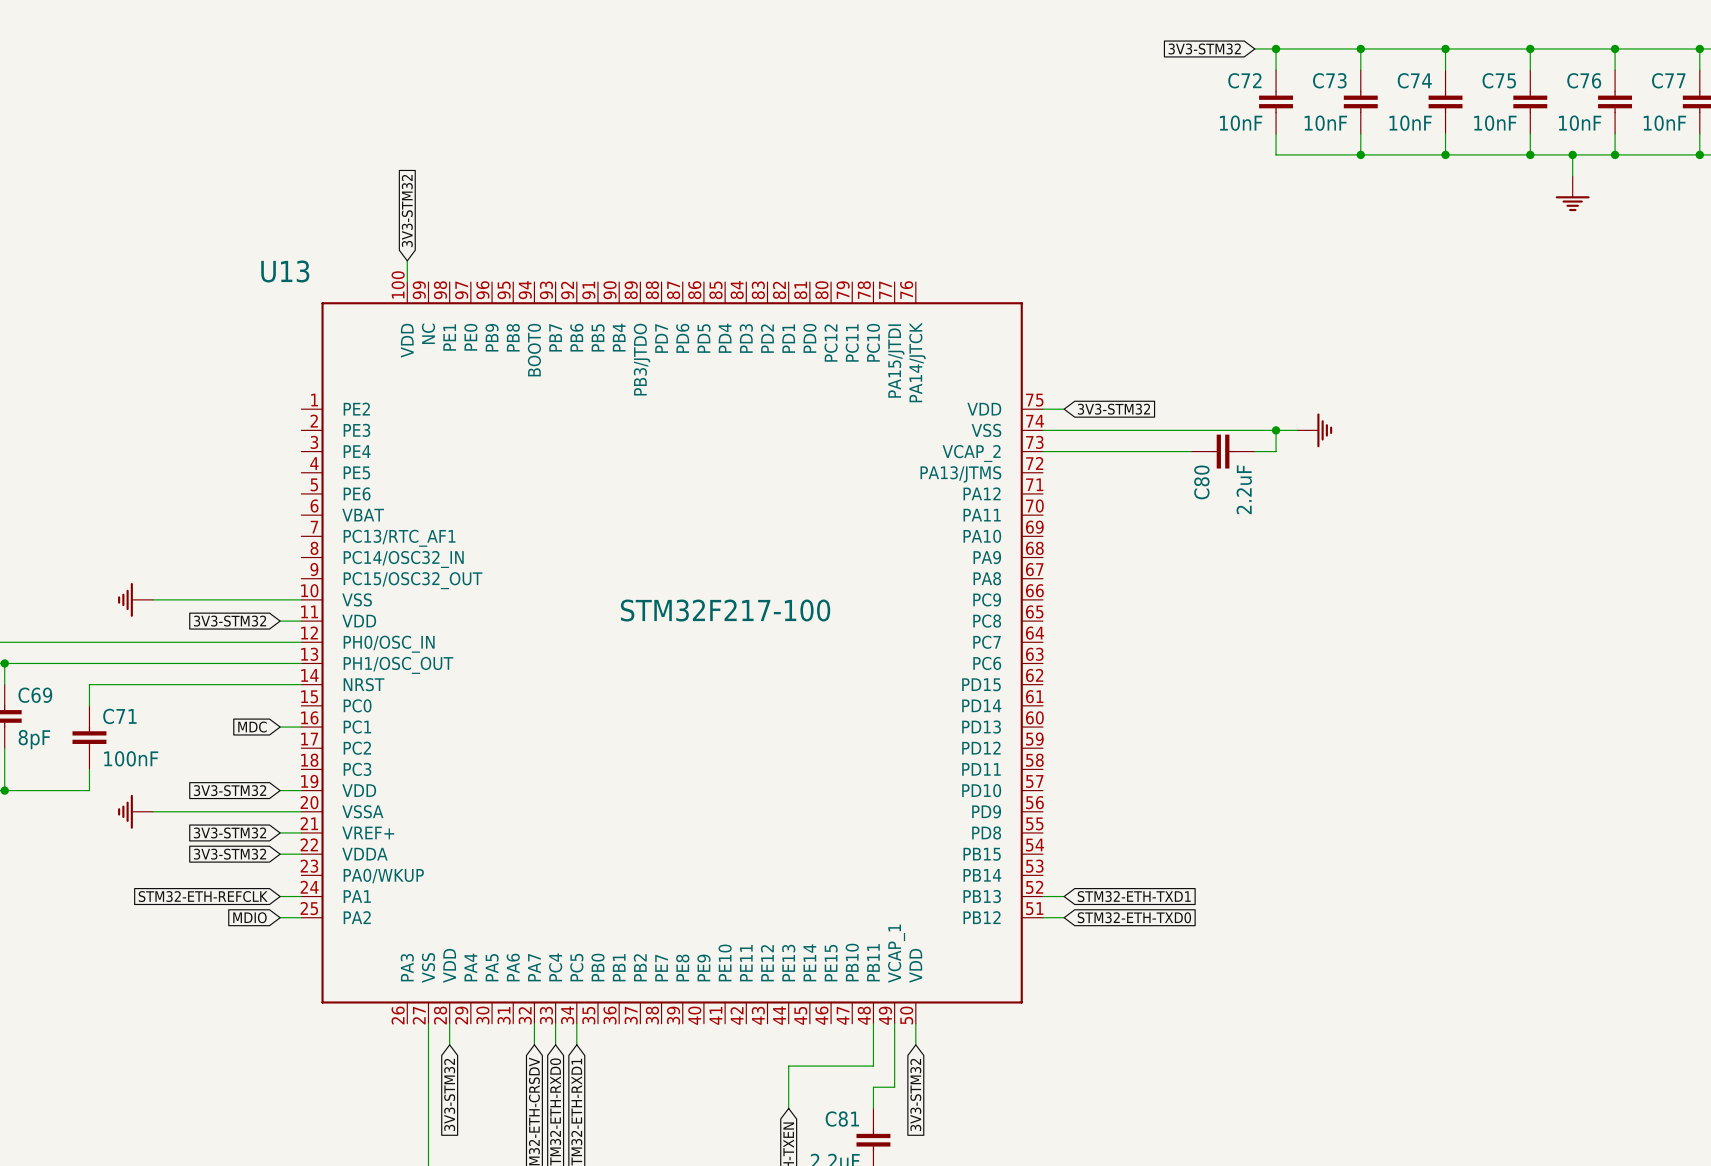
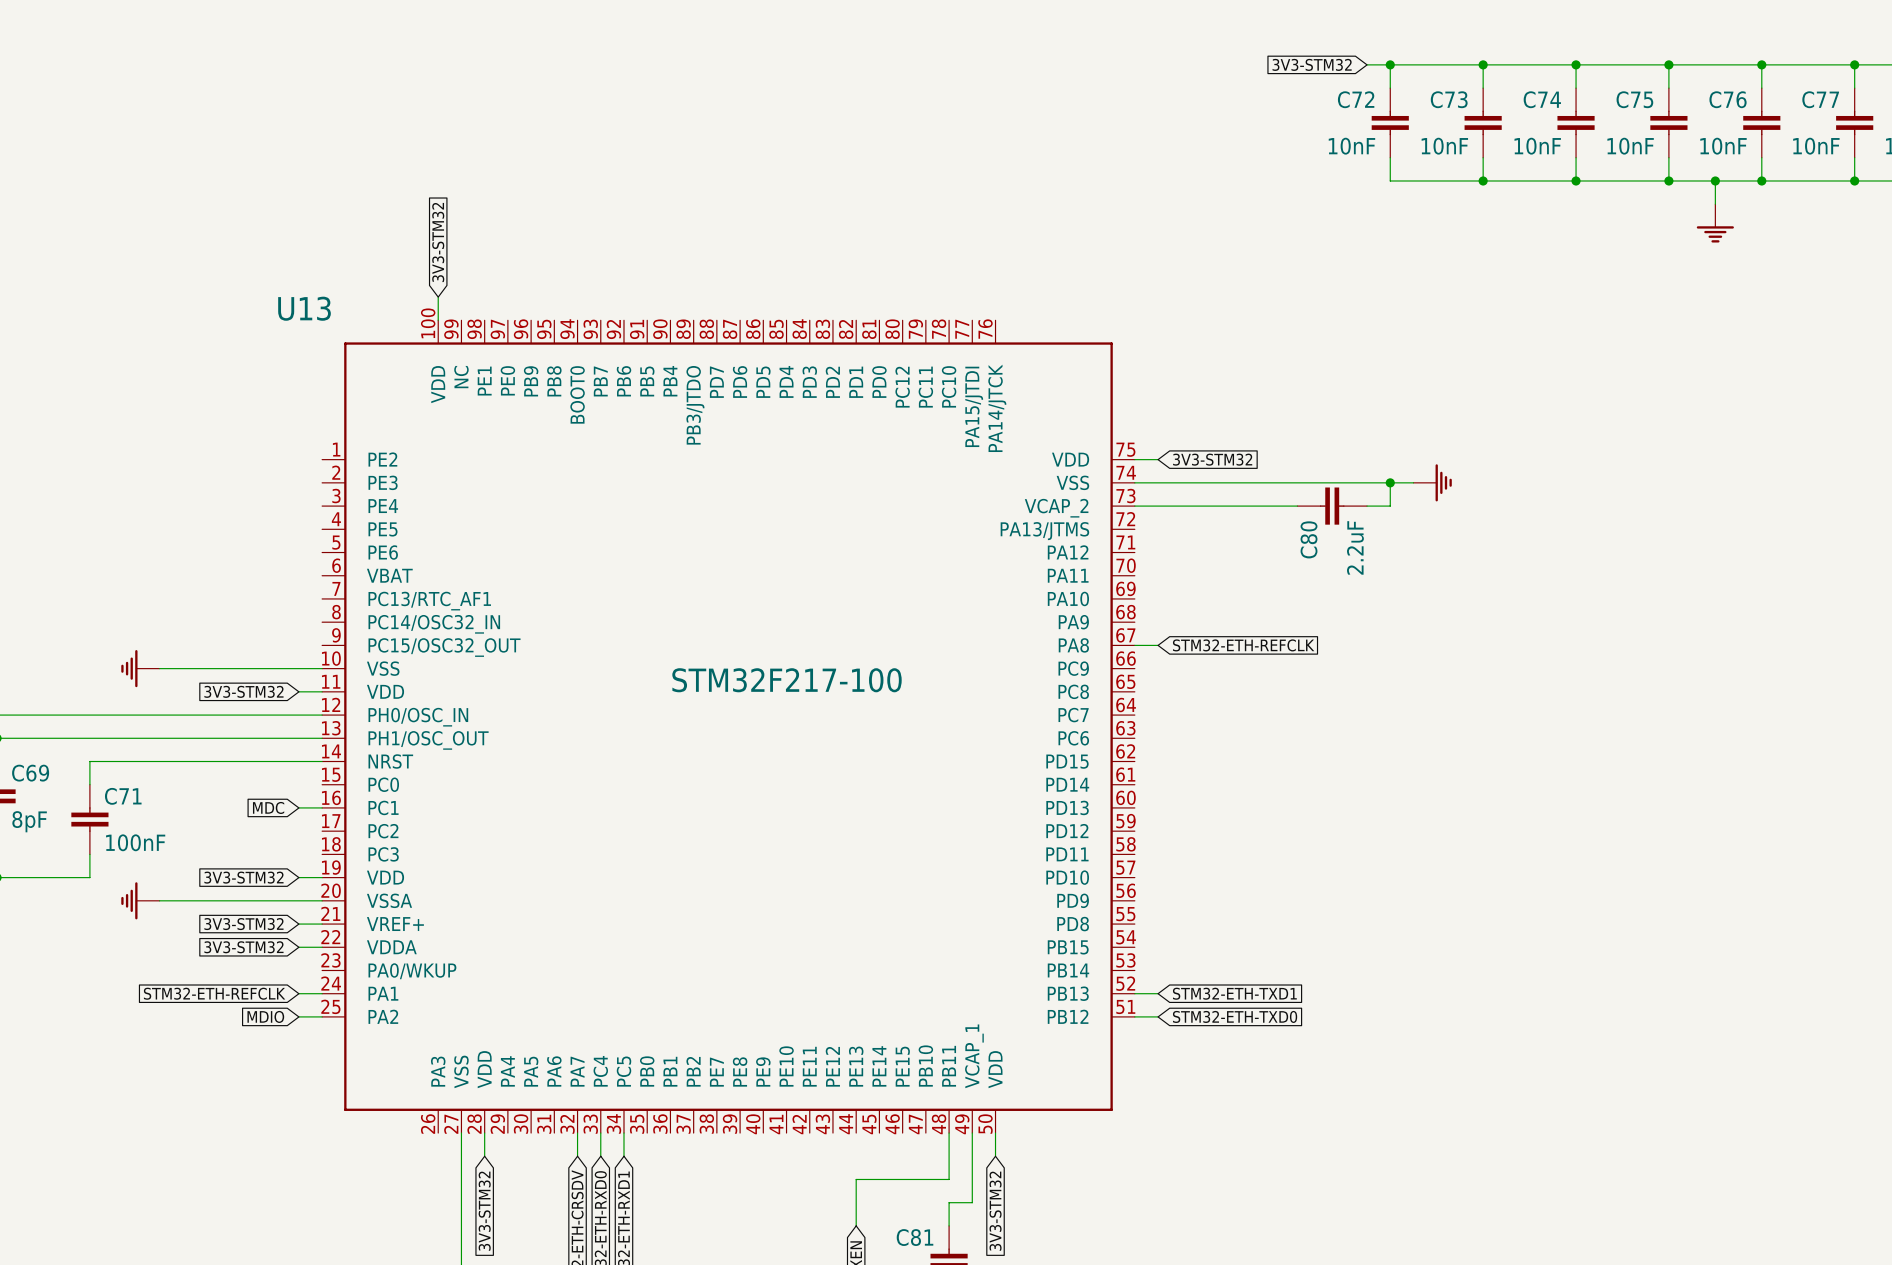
wire: none -> (1134, 645) (1158, 645)
global label: none -> STM32-ETH-REFCLK (1243, 645)

